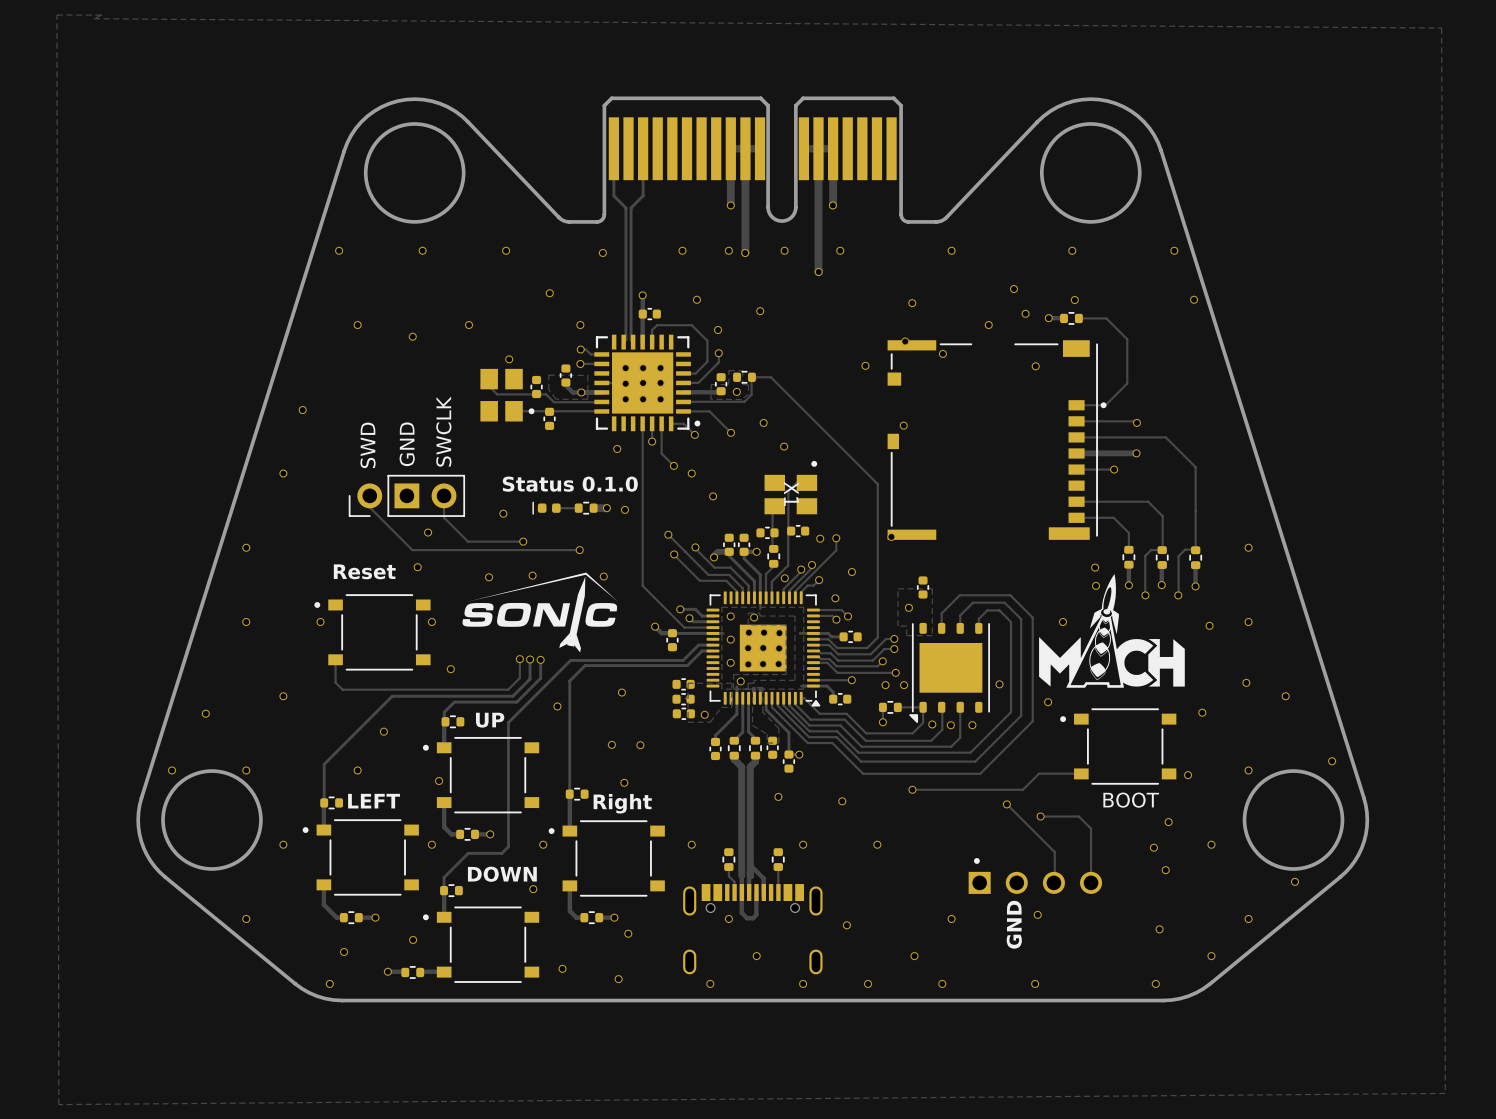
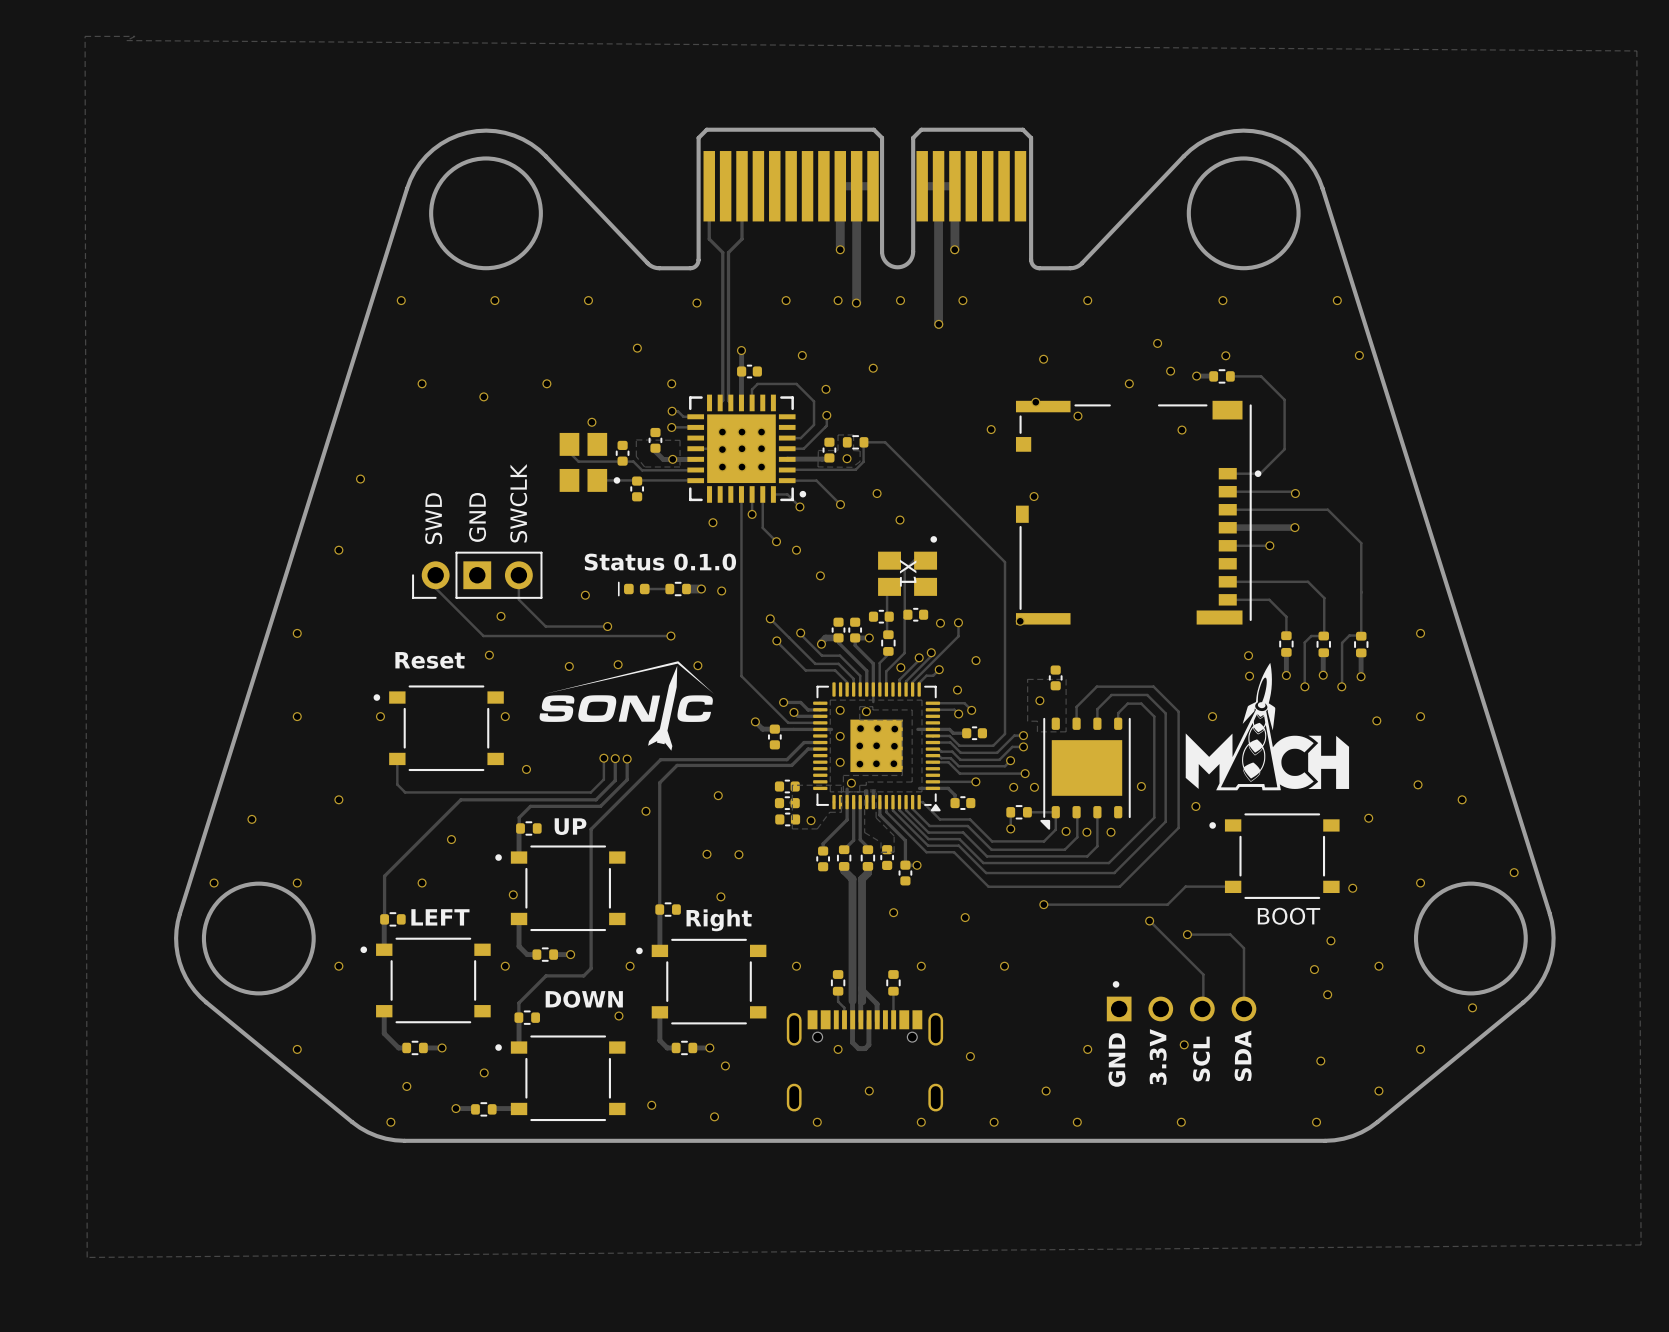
text: GND (1014, 924) -> 3.3V (1158, 1056)
text: none -> SDA (1243, 1055)
text: none -> SCL (1201, 1059)
text: none -> GND (1117, 1060)

